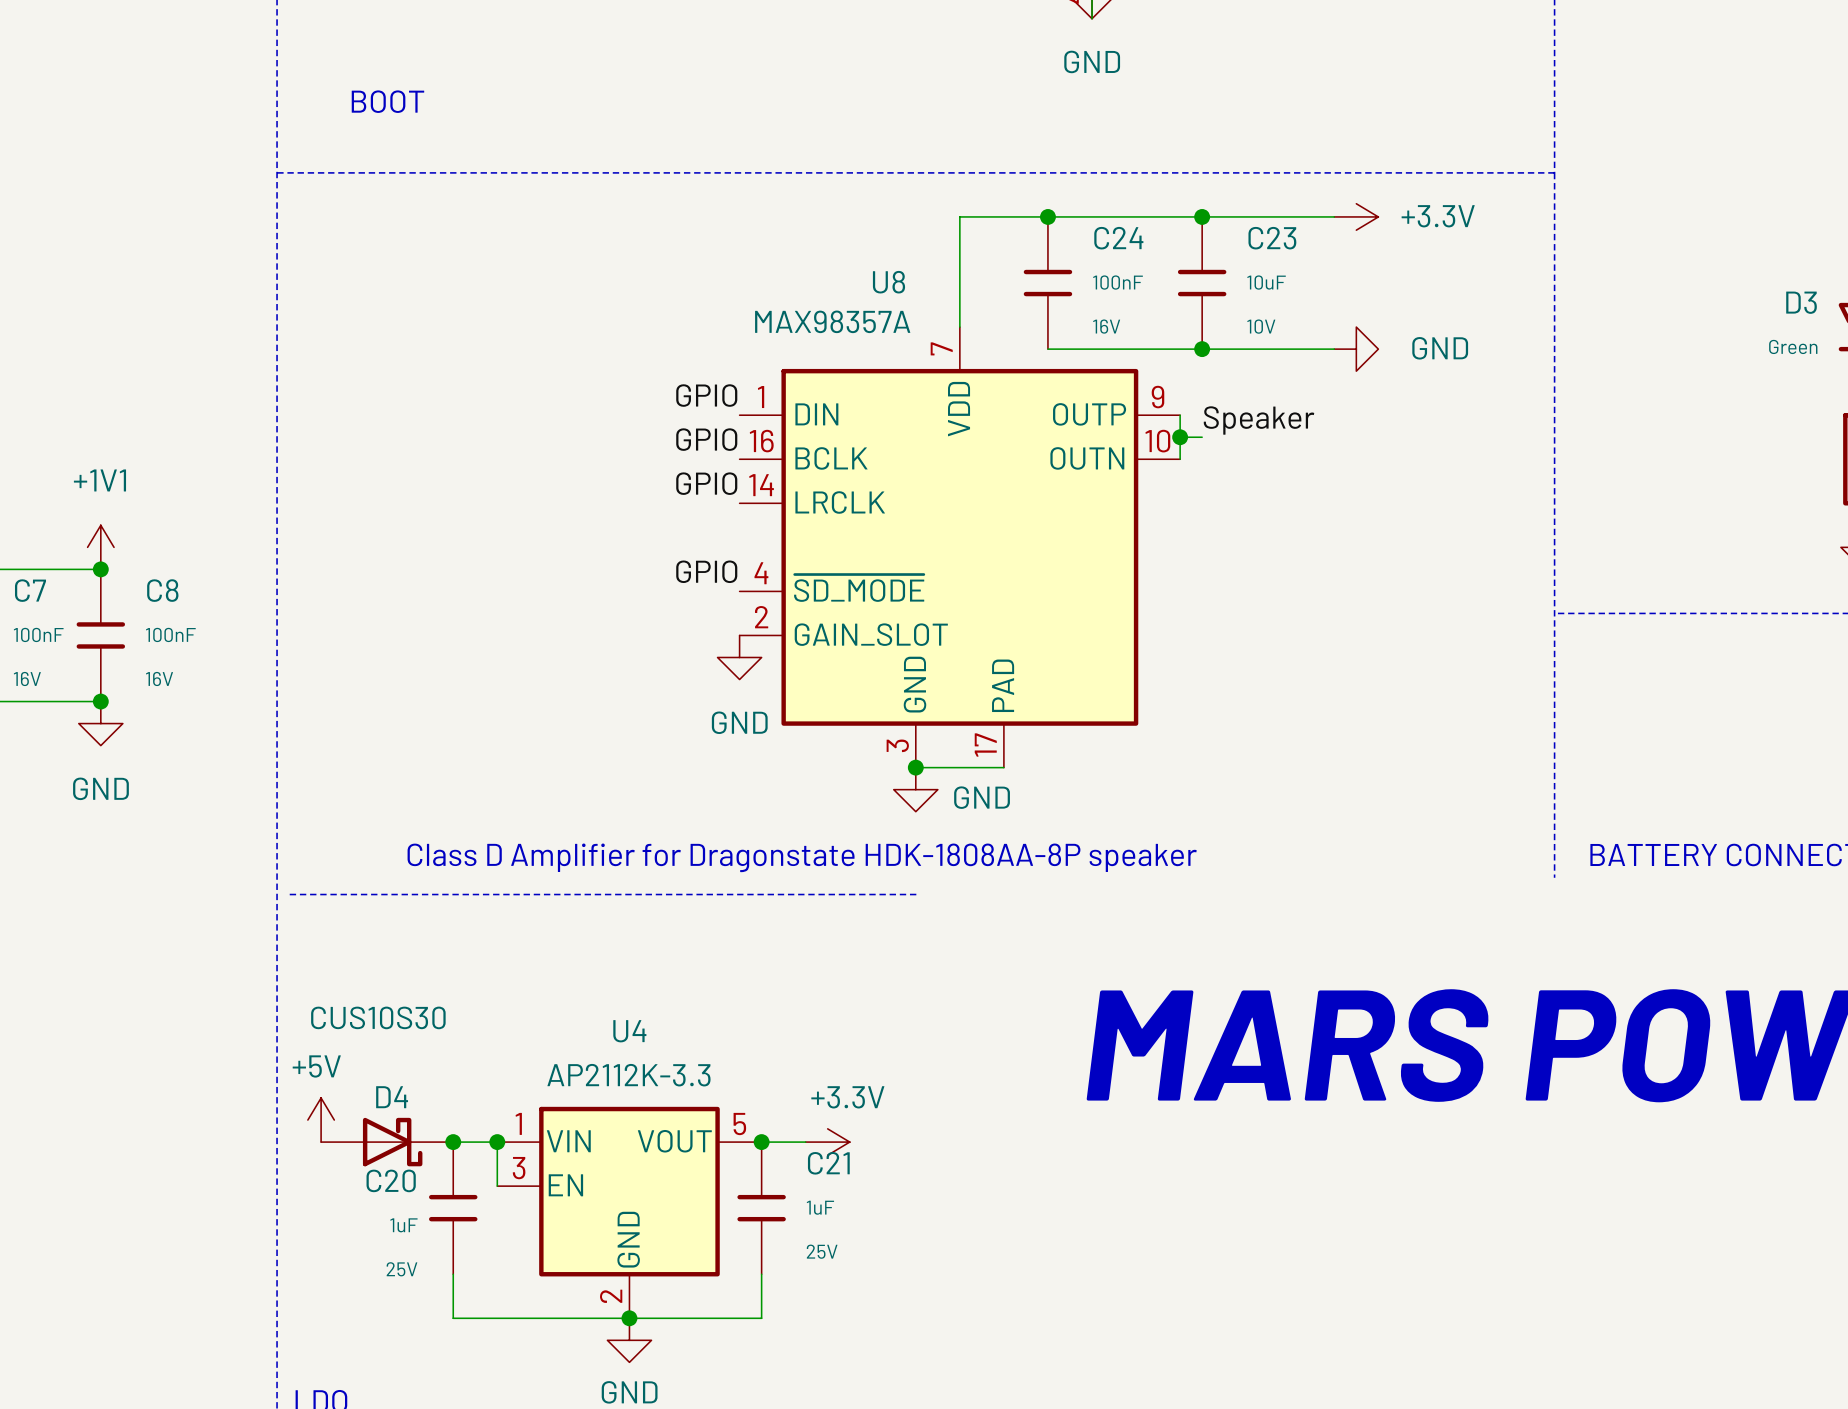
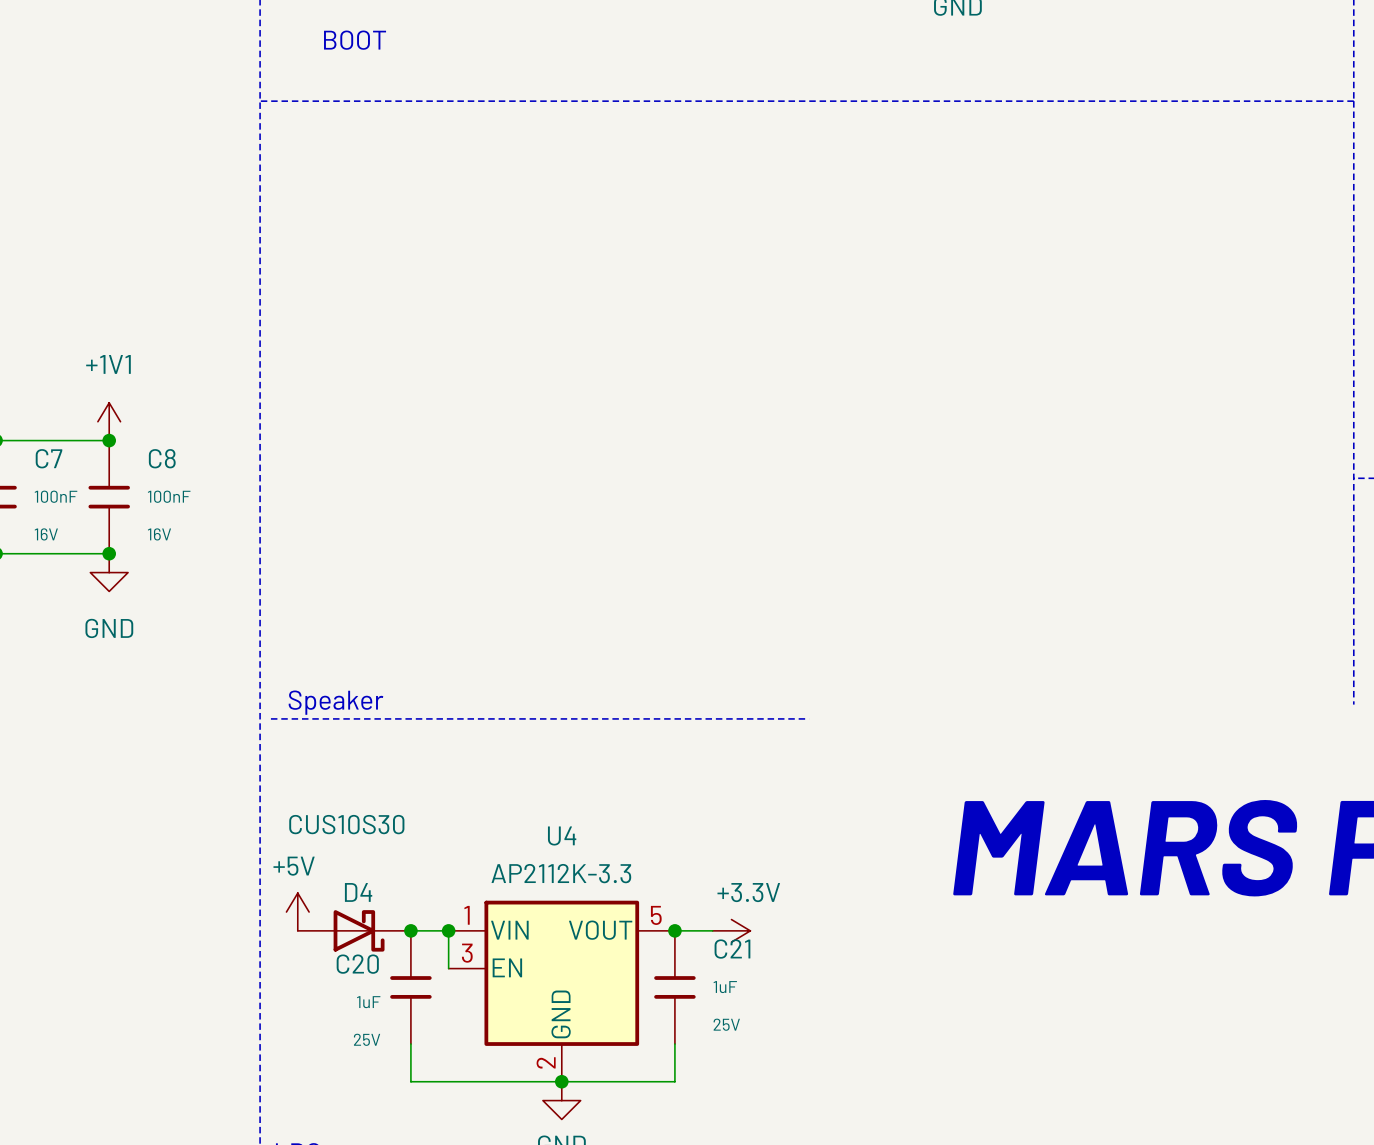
junction: (1047, 216) -> none
junction: (1202, 216) -> none
wire: (1334, 216) (959, 216) (959, 327) -> none
power symbol: +3.3V (1356, 216) -> none
C24: 100nF (1047, 283) -> none
C23: 10uF (1202, 283) -> none
wire: (1047, 349) (1334, 349) -> none
junction: (1202, 349) -> none
power symbol: GND (1356, 349) -> none
label: GPIO (706, 395) -> none
wire: (1180, 415) (1180, 459) -> none
label: Speaker (1259, 420) -> none
wire: (1180, 437) (1202, 437) -> none
junction: (1180, 437) -> none
label: GPIO (706, 439) -> none
label: GPIO (706, 483) -> none
U8: MAX98357A (959, 547) -> none
label: GPIO (706, 571) -> none
power symbol: GND (739, 657) -> none
wire: (915, 767) (1003, 767) -> none
junction: (915, 767) -> none
power symbol: GND (915, 789) -> none
text: Class D Amplifier for Dragonstate HDK-1808AA-8P speaker (802, 857) -> none
text: none -> Speaker (335, 702)

